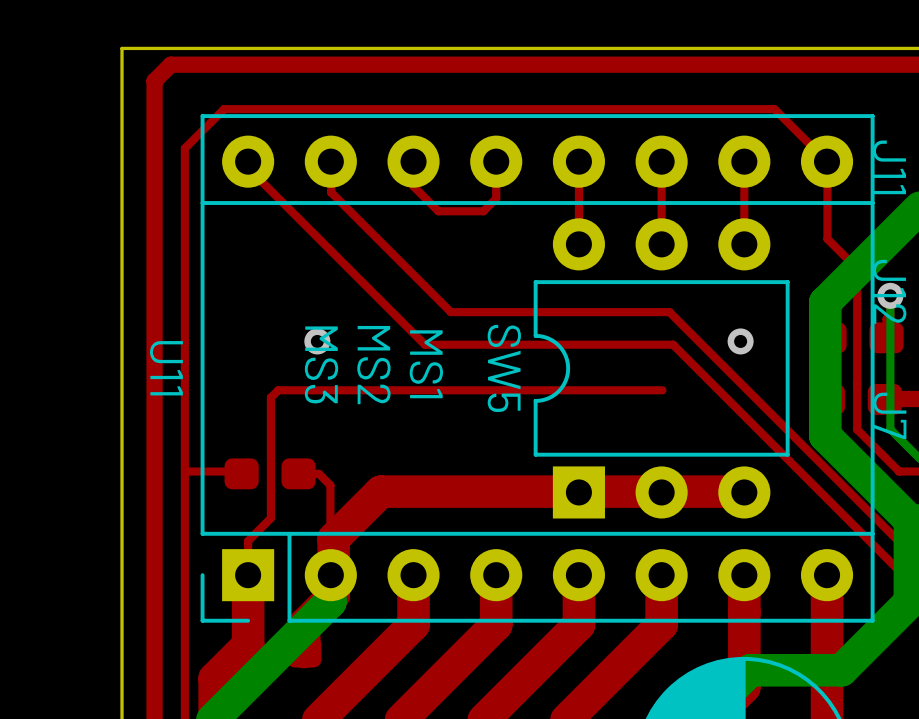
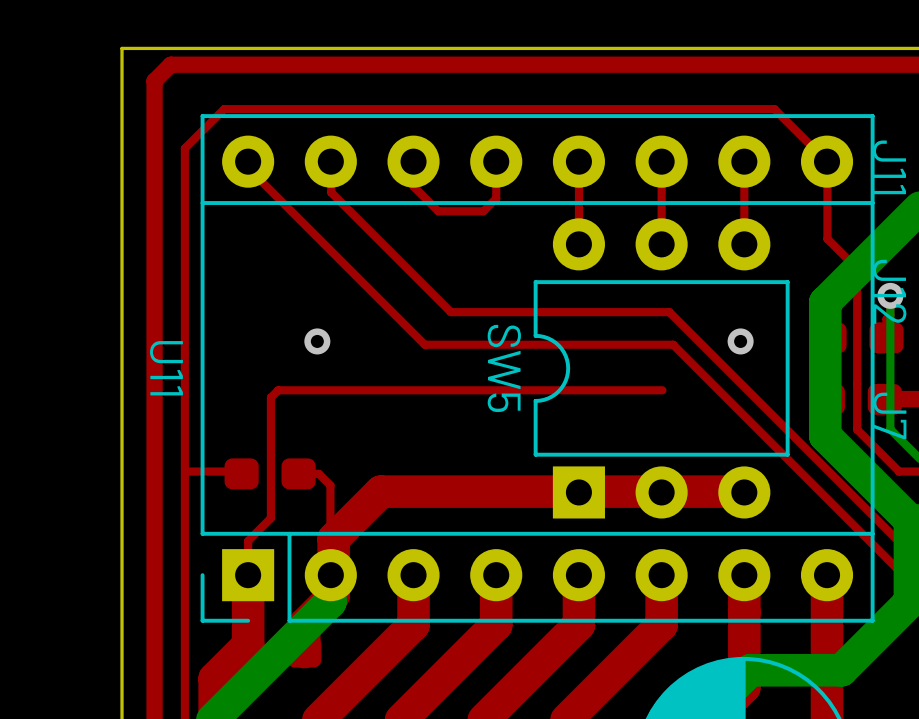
text: MS3 (321, 364) -> none
text: MS1 (426, 364) -> none
text: MS2 (373, 365) -> none

